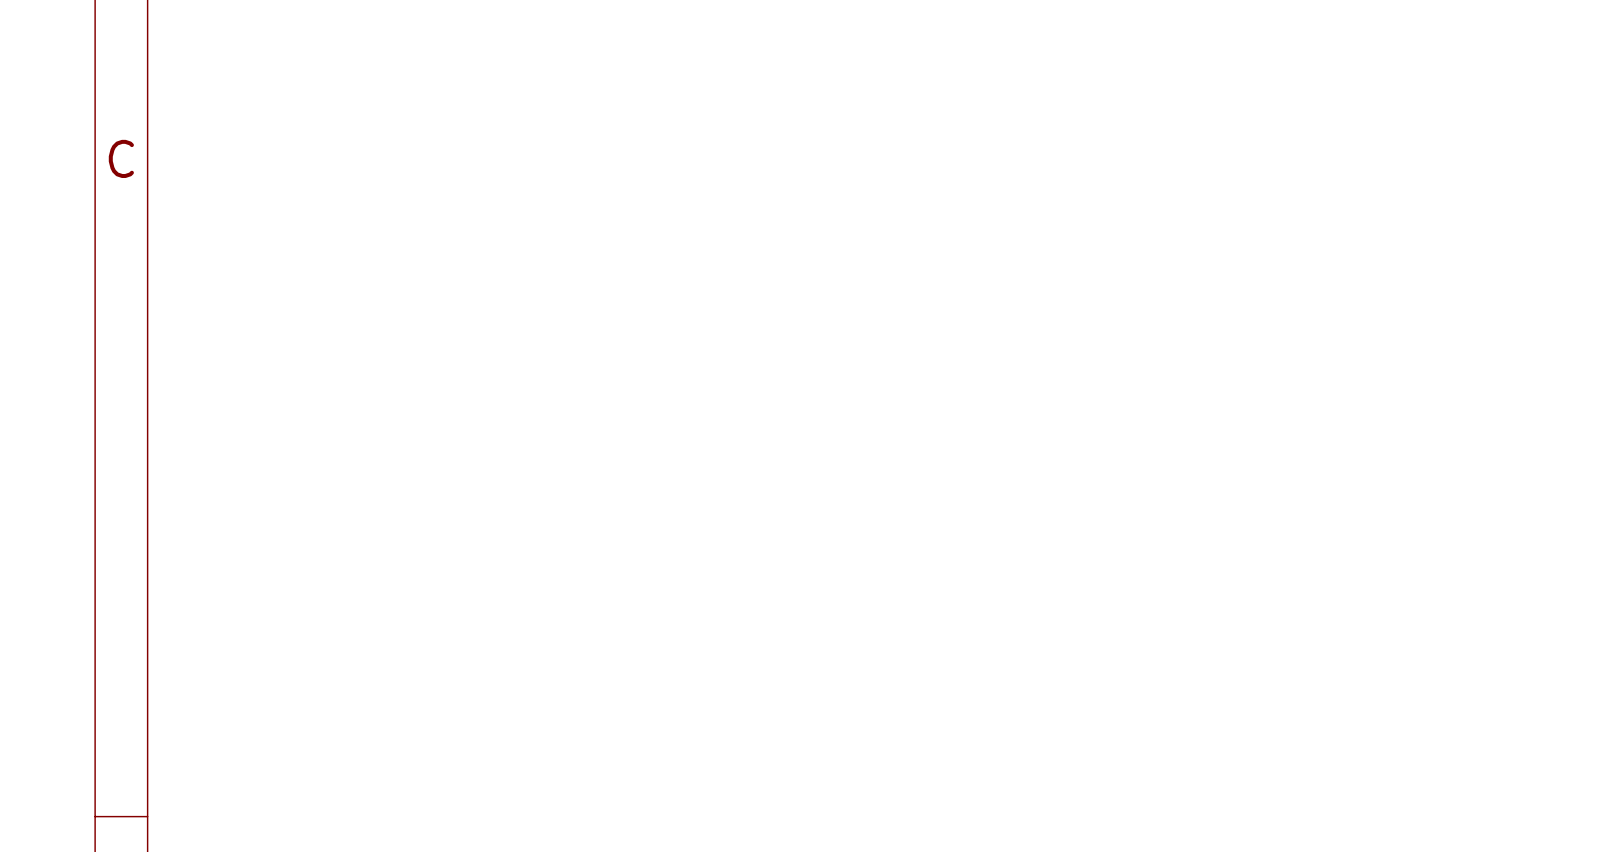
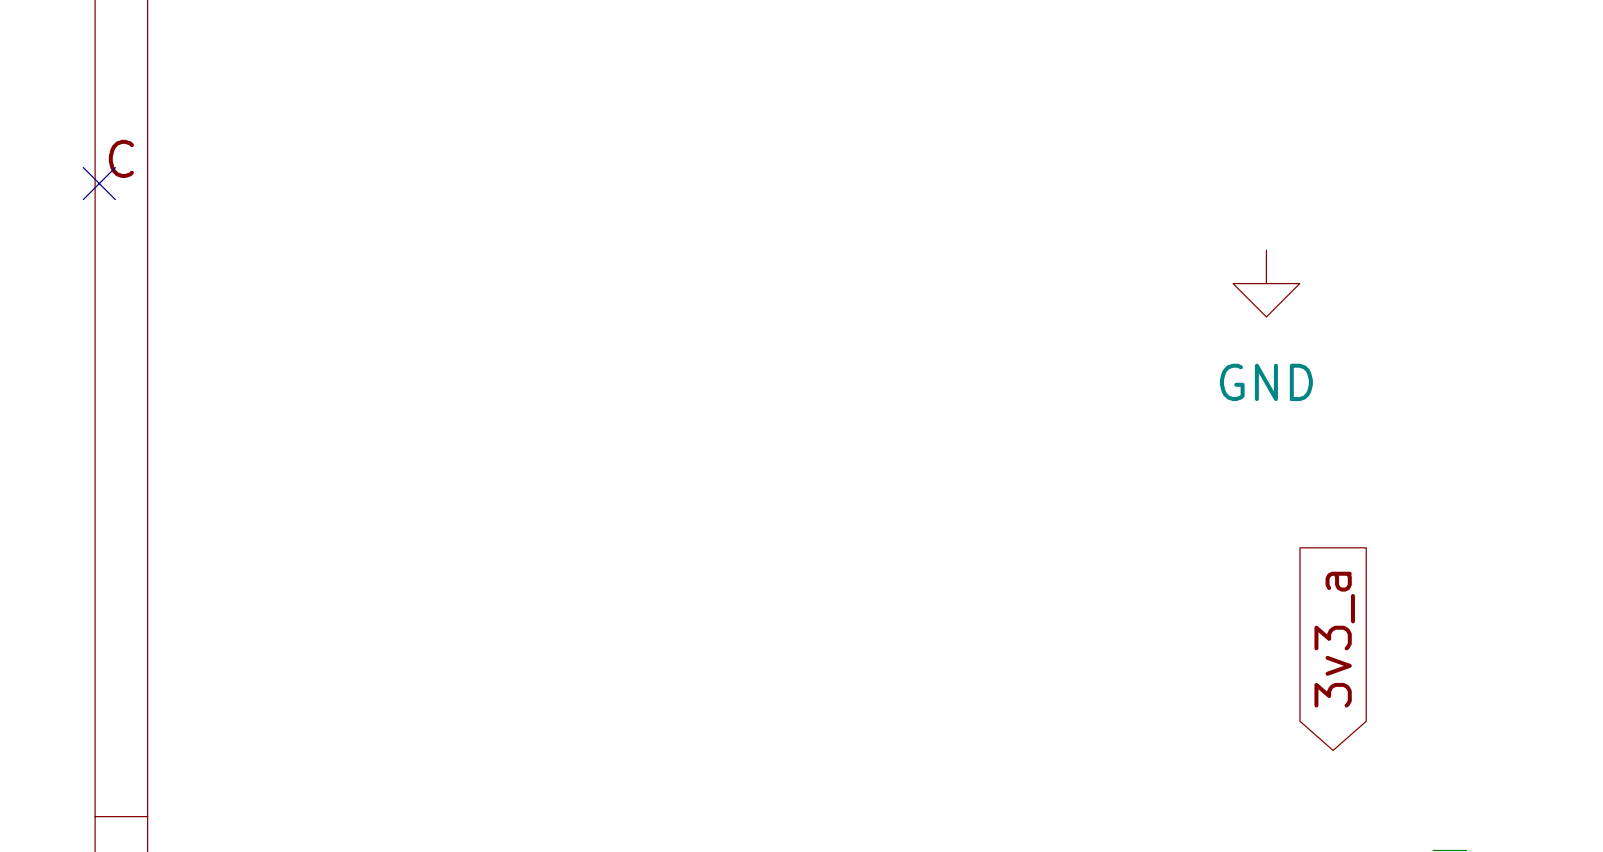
no-connect mark: none -> (99, 183)
power symbol: none -> GND (1266, 283)
global label: none -> 3v3_a (1334, 639)
wire: none -> (1433, 850) (1466, 850)

